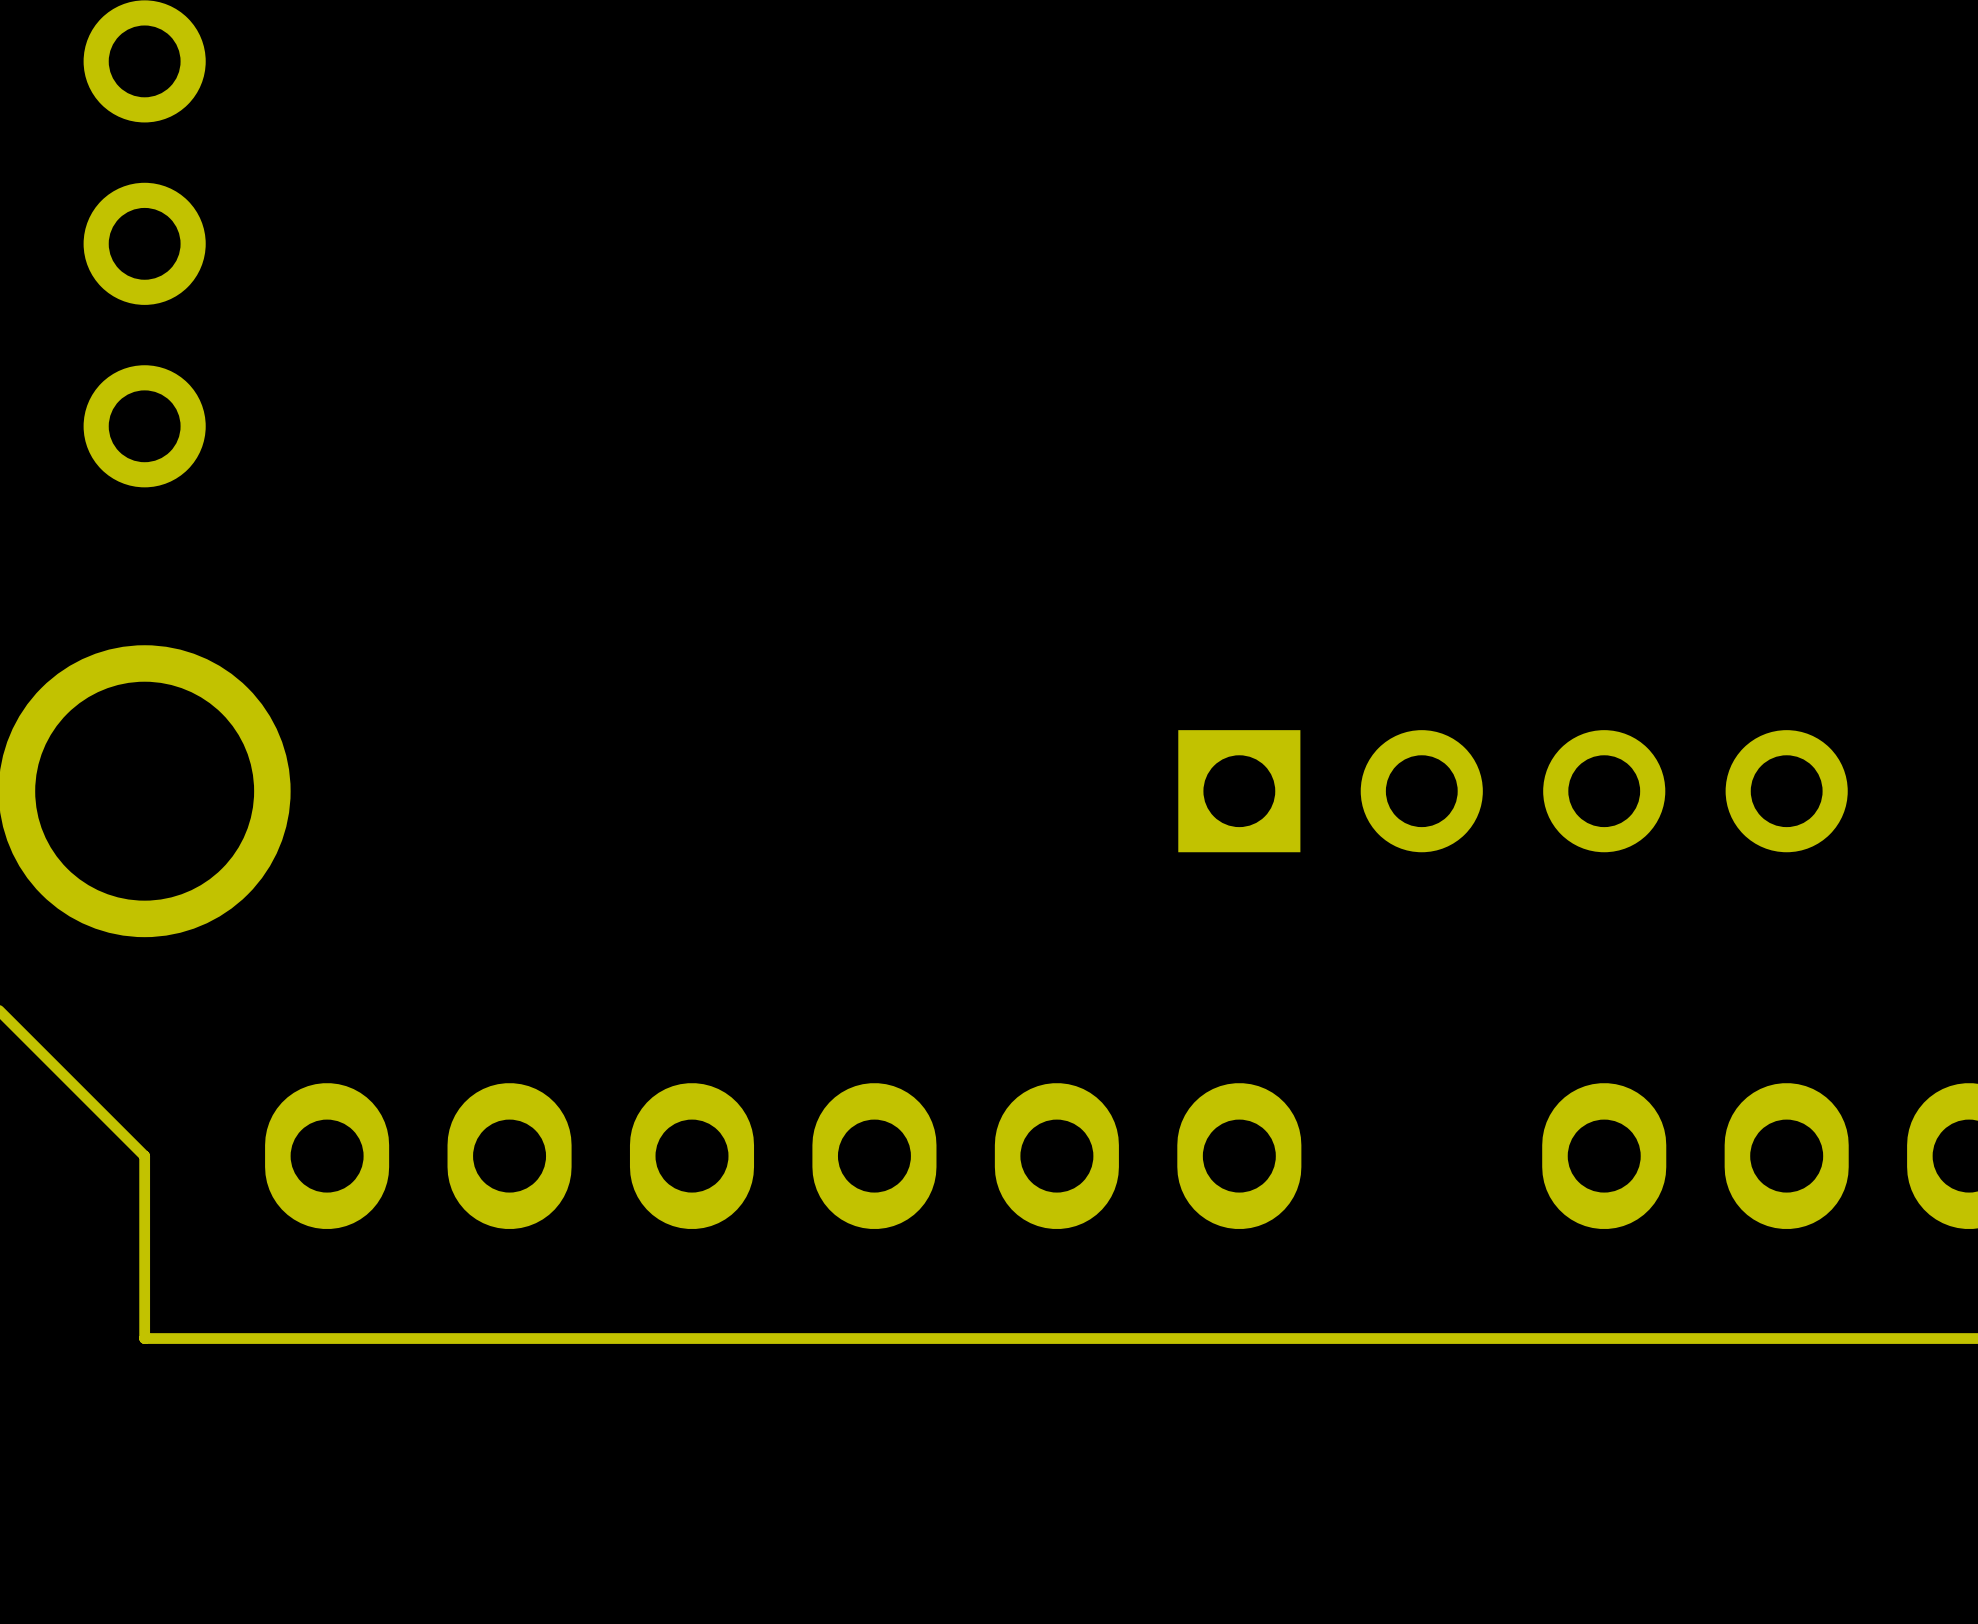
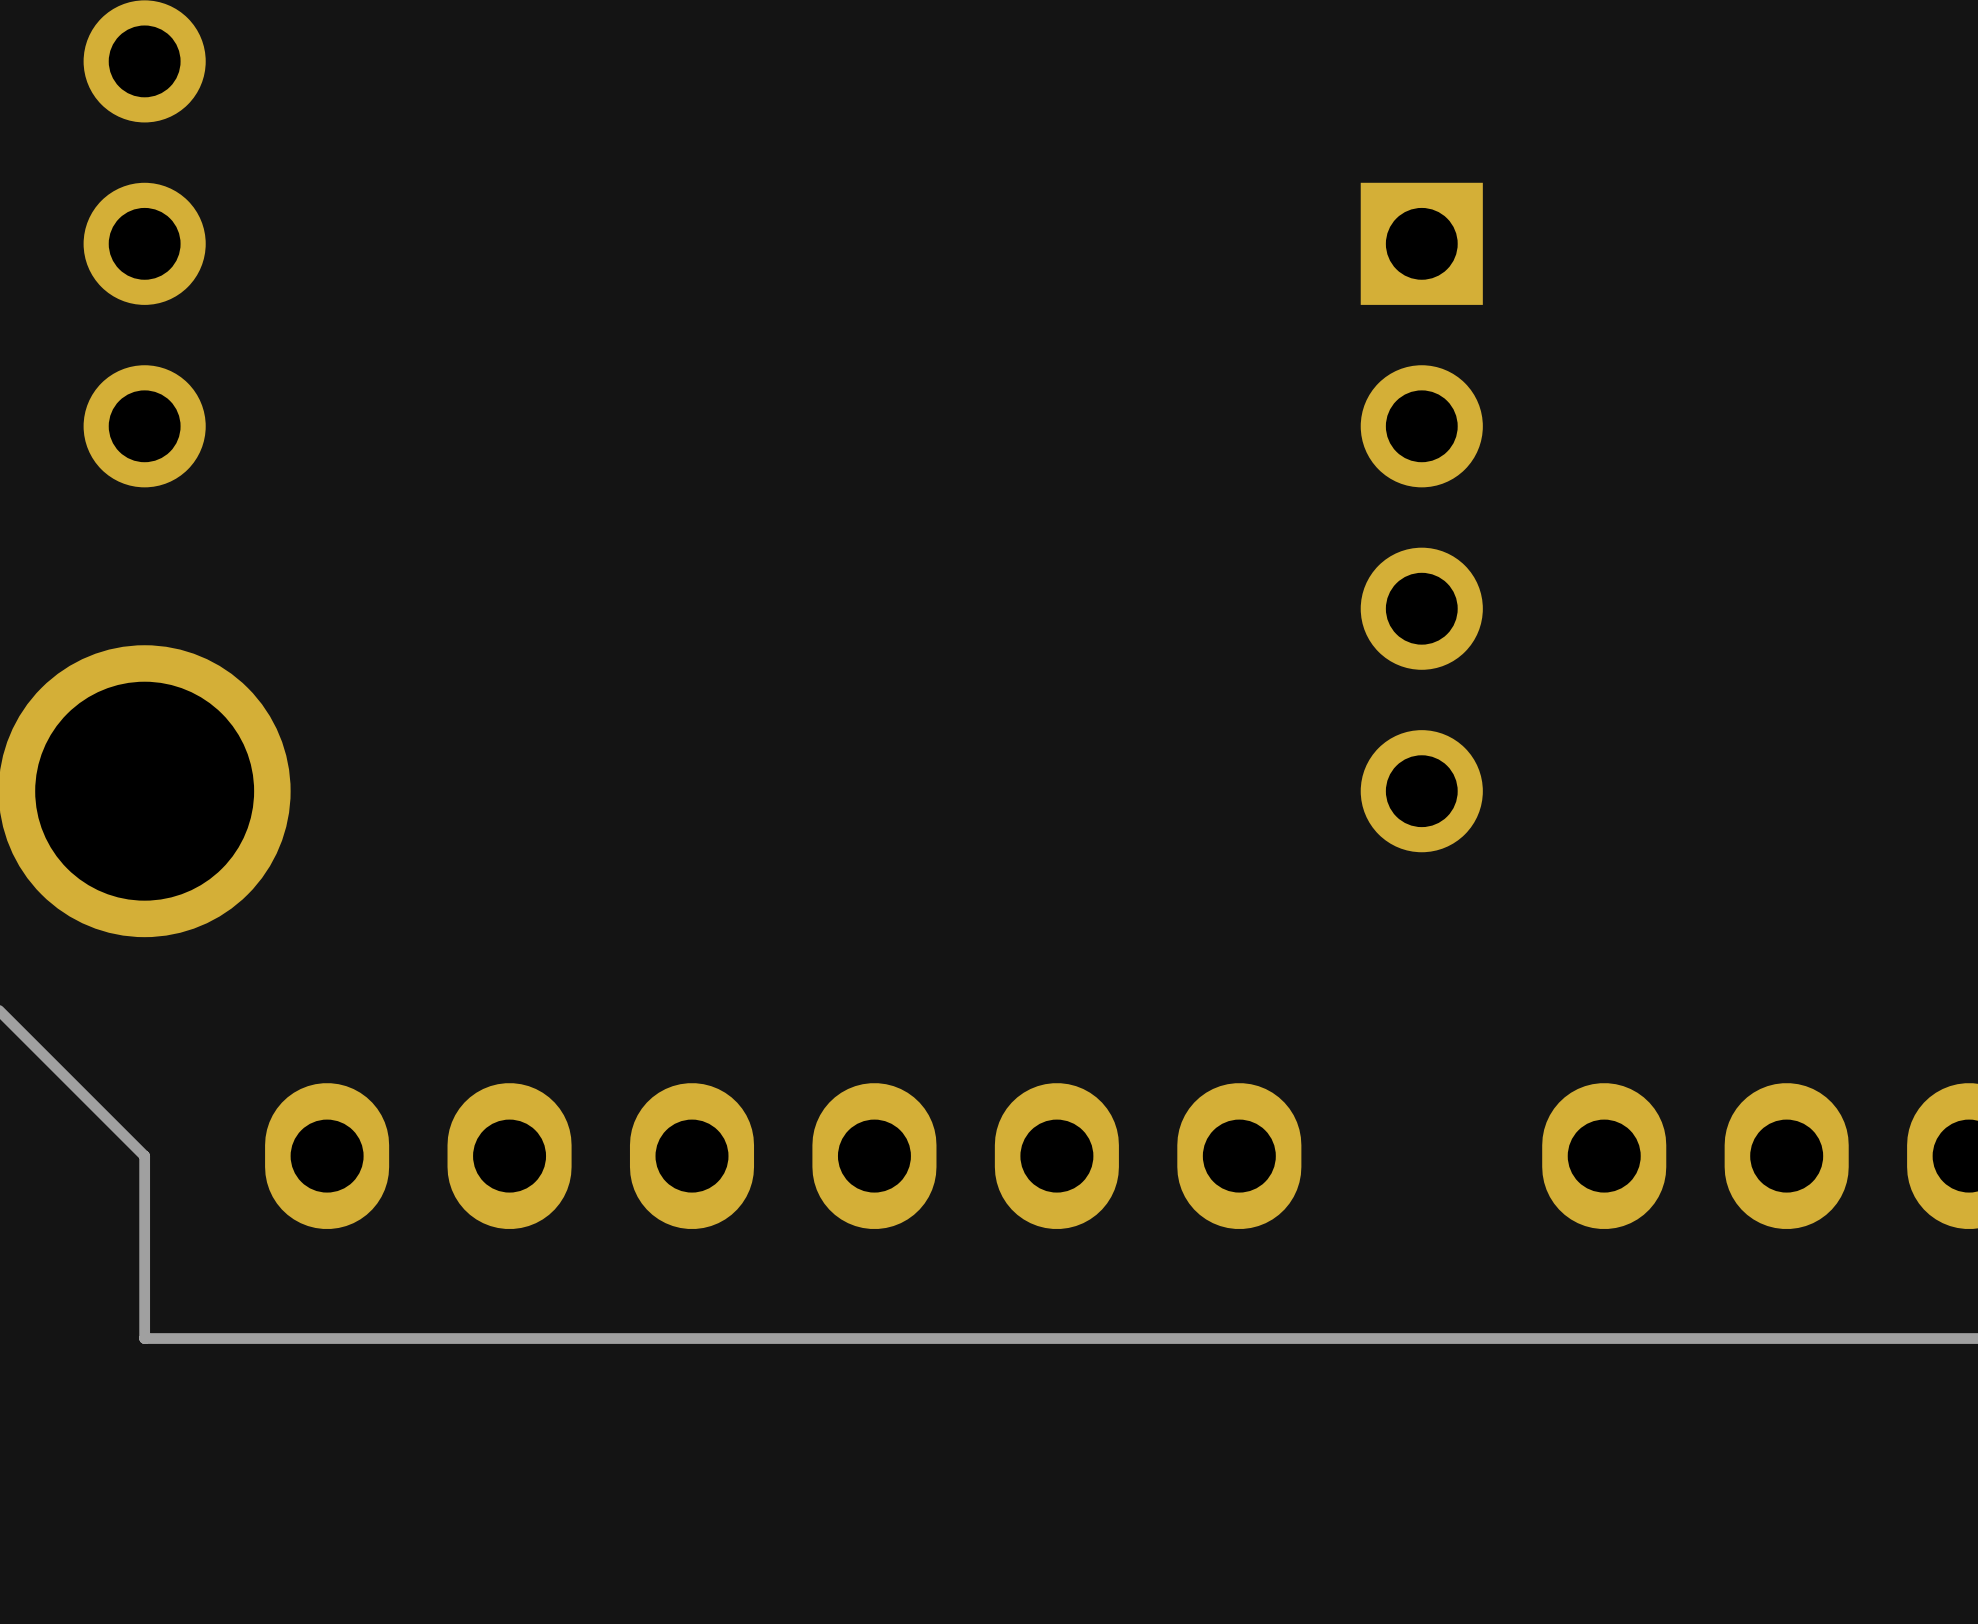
part rotation: 0° (1513, 791) -> 90° clockwise (1421, 517)

